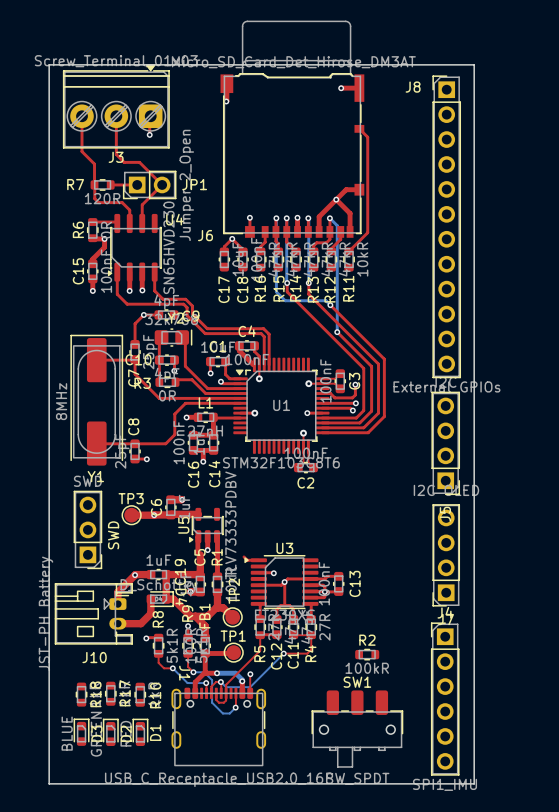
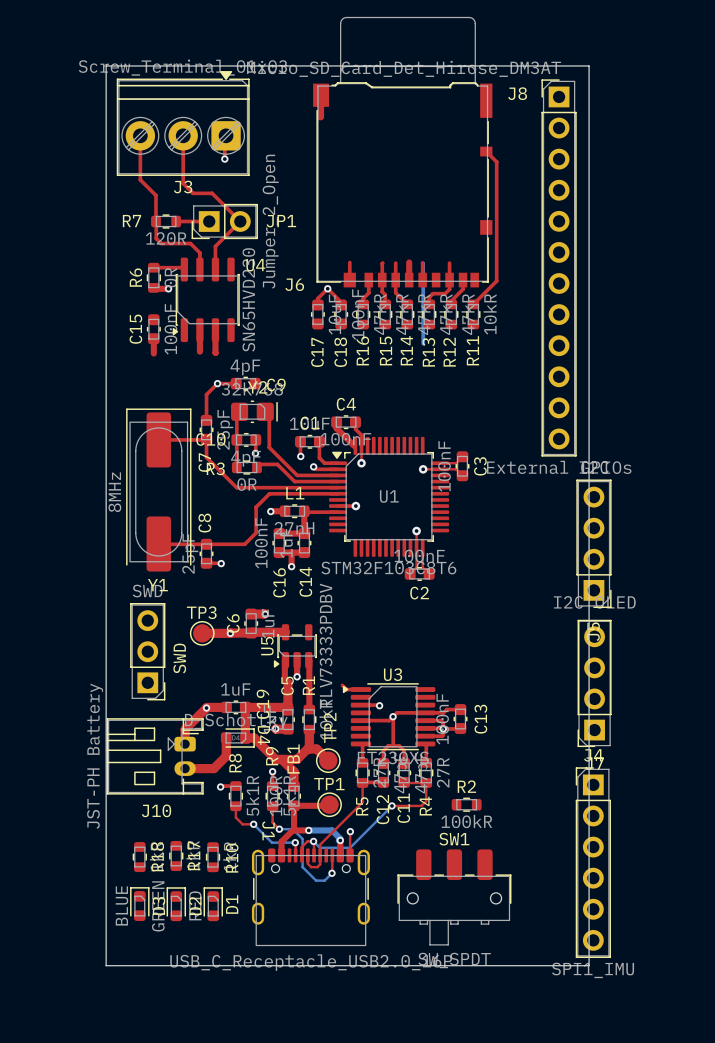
board edge: (49, 64) (474, 64) (474, 783) (49, 783) (49, 64) -> (106, 65) (106, 965) (589, 965) (589, 65) (106, 65)
top track: (341, 88) (359, 88) -> none
via: (341, 88) -> none
via: (226, 101) -> none
top track: (359, 189) (346, 189) (319, 216) (319, 231) -> none
top track: (336, 199) (350, 213) (350, 231) -> none
via: (336, 199) -> none
via: (249, 217) -> none
via: (297, 217) -> none
bottom track: (276, 218) (276, 291) (285, 300) (325, 300) (330, 305) -> none
via: (276, 218) -> none
bottom track: (286, 218) (287, 283) -> none
via: (286, 218) -> none
via: (308, 218) -> none
bottom track: (329, 218) (337, 225) (337, 332) -> none
via: (329, 218) -> none
J8 position: (446, 226) -> (559, 267)
top track: (104, 238) (104, 247) (92, 259) (92, 263) -> none
top track: (117, 272) (117, 294) (127, 304) (183, 304) (187, 307) (187, 315) (205, 333) (261, 333) (264, 336) (264, 364) -> none
top track: (154, 272) (154, 290) (163, 299) (185, 299) (192, 306) (192, 313) (207, 328) (263, 328) (269, 334) (269, 364) -> none
top track: (287, 283) (287, 291) (363, 368) (363, 410) (356, 418) (322, 418) -> none
via: (287, 283) -> none
top track: (308, 283) (308, 294) (378, 364) (378, 413) (363, 427) (322, 427) -> none
via: (308, 283) -> none
via: (92, 290) -> none
via: (129, 290) -> none
via: (142, 290) -> none
top track: (330, 305) (384, 359) (384, 416) (368, 432) (322, 432) -> none
via: (330, 305) -> none
top track: (337, 332) (371, 366) (371, 411) (359, 422) (322, 422) -> none
via: (337, 332) -> none
top track: (355, 384) (355, 394) (352, 397) (334, 397) (330, 393) (322, 393) -> none
via: (355, 384) -> none
top track: (322, 403) (355, 403) -> none
via: (355, 403) -> none
top track: (322, 408) (350, 408) (352, 410) -> none
via: (352, 410) -> none
top track: (307, 413) (322, 413) -> none
via: (307, 413) -> none
R2 position: (367, 654) -> (466, 804)
SW1 position: (357, 728) -> (454, 897)

